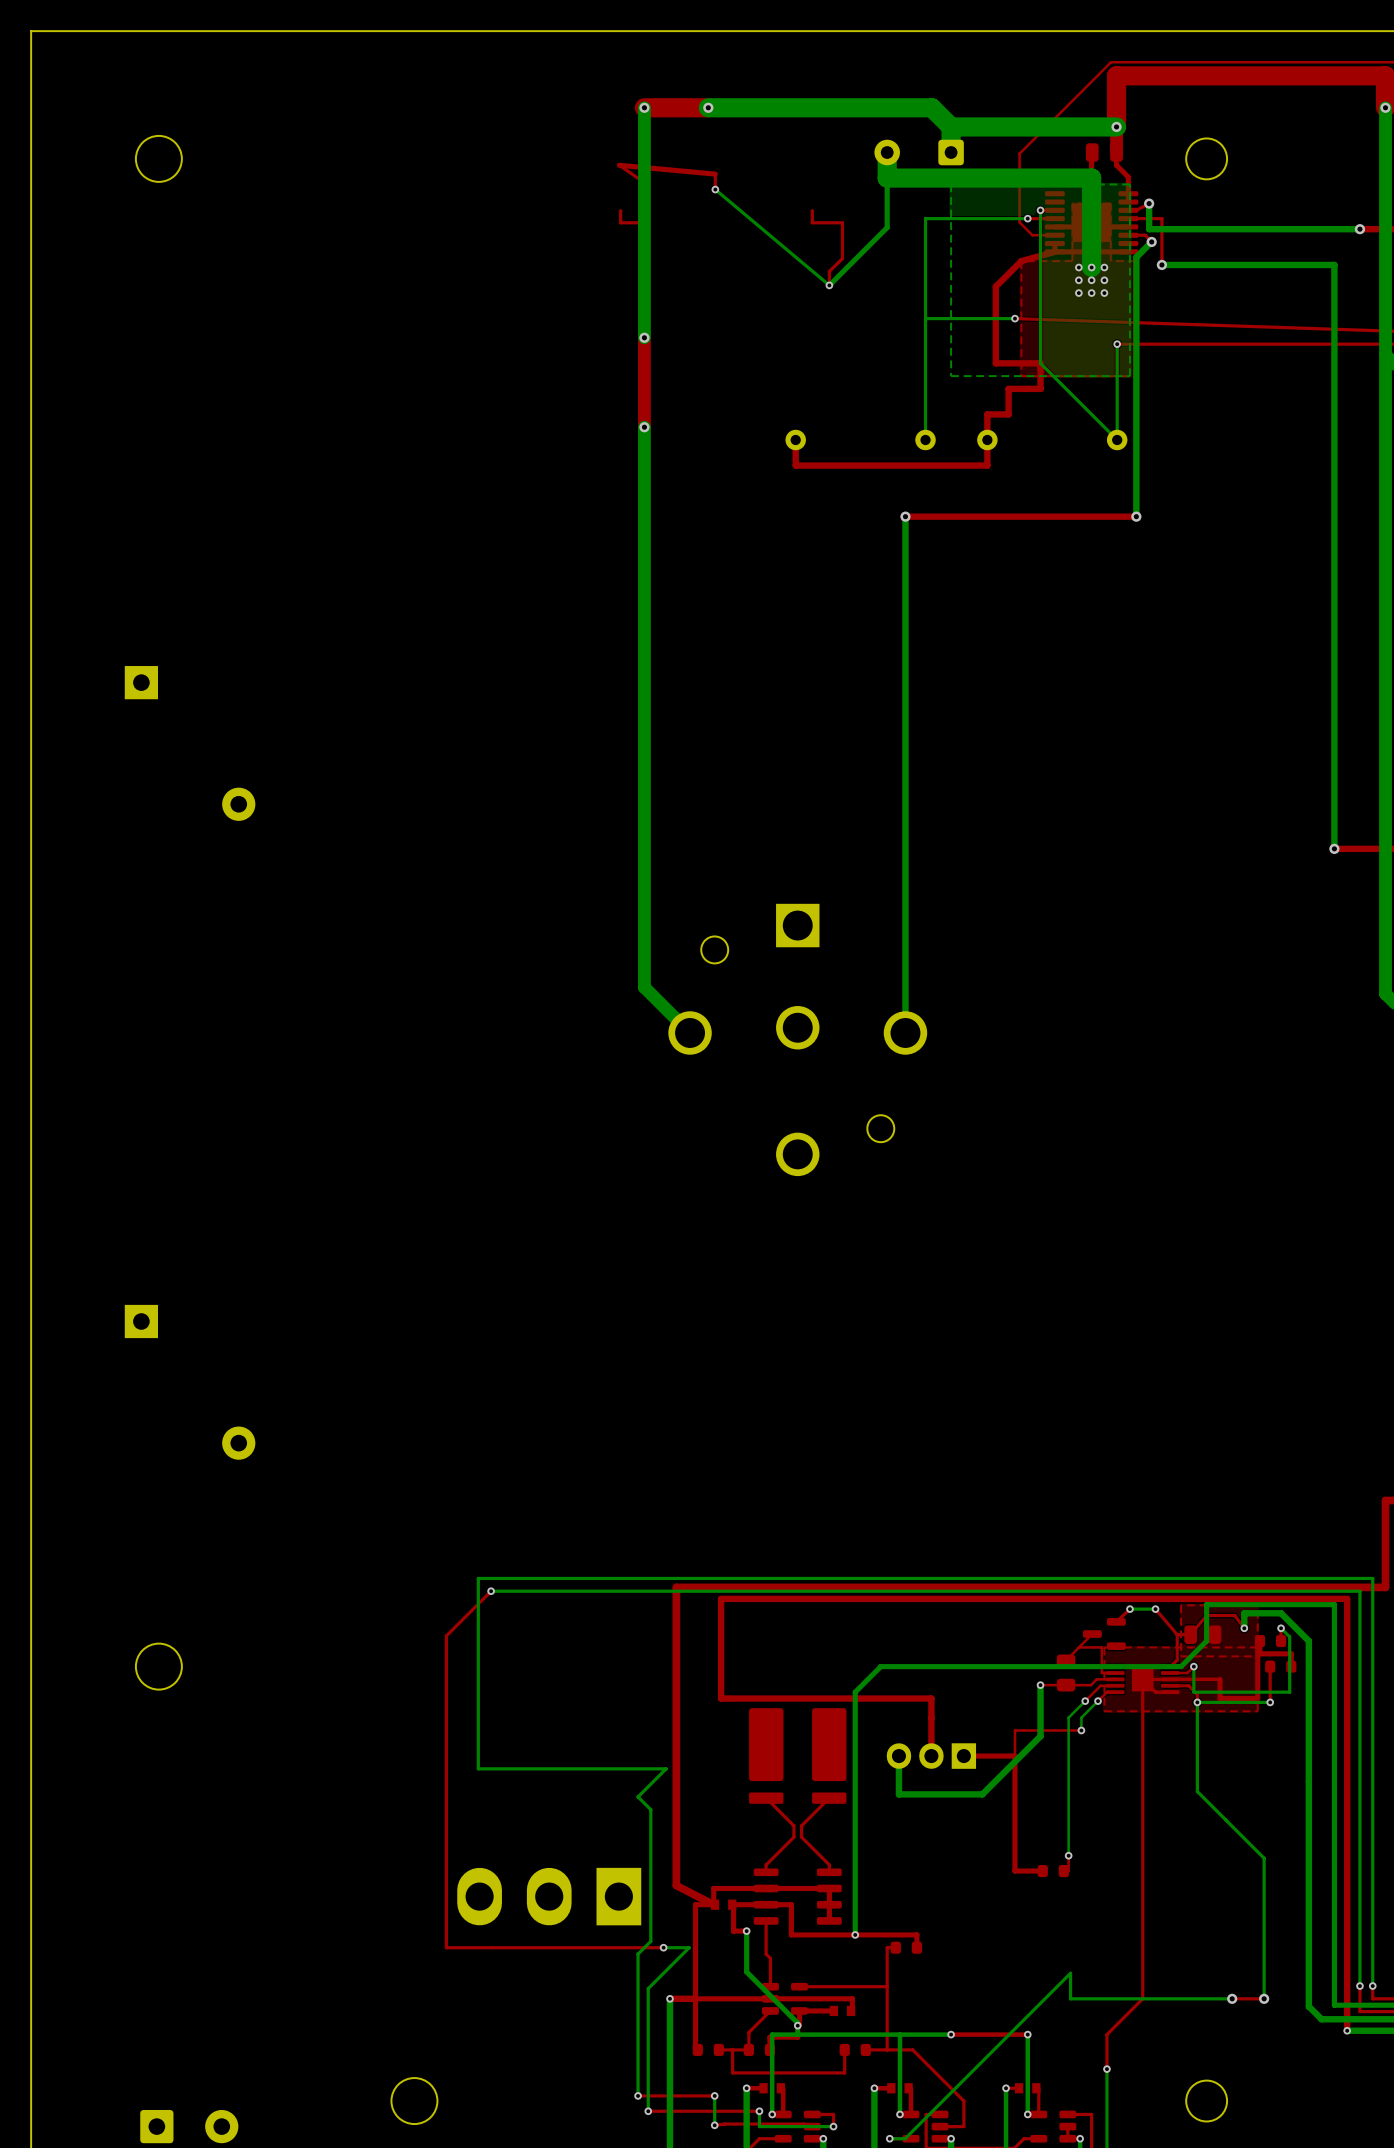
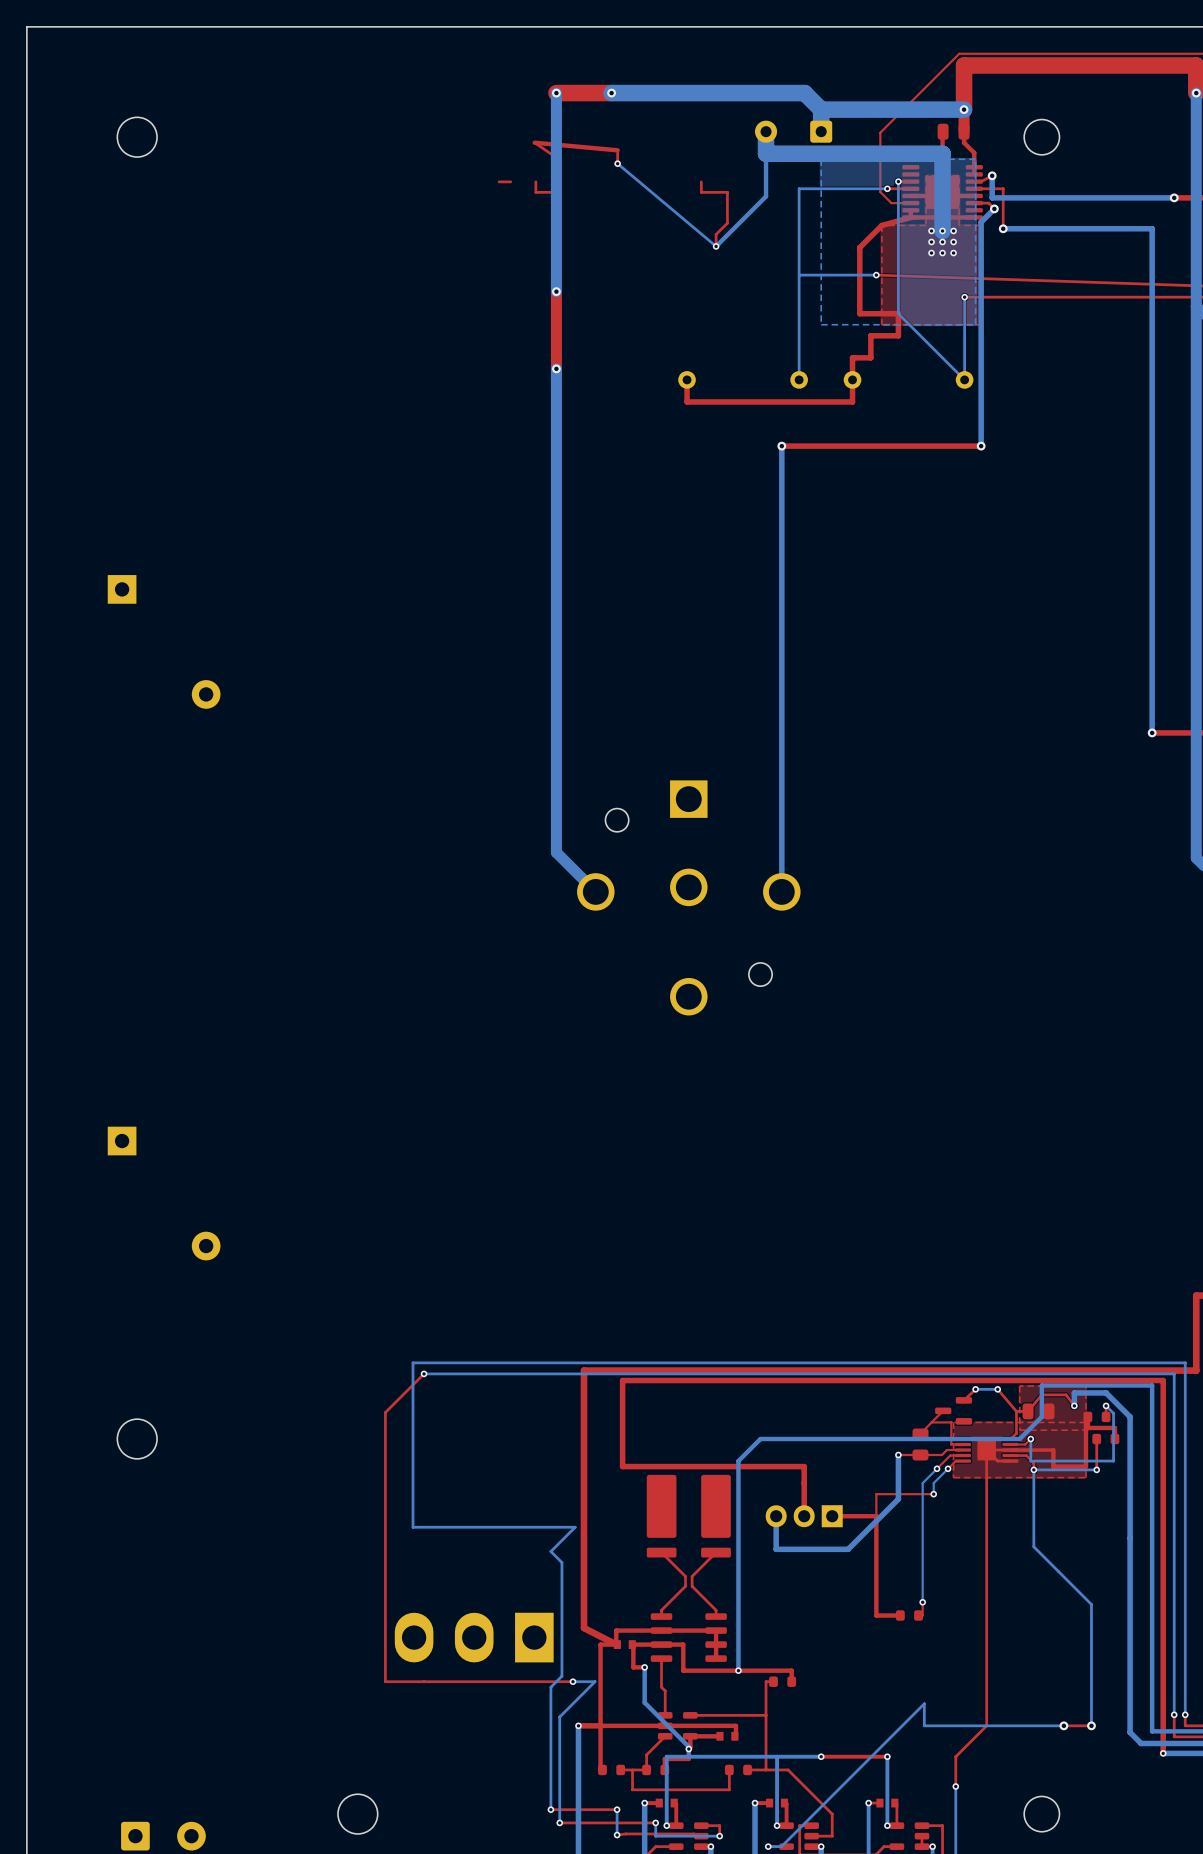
top track: none -> (510, 181) (499, 181)

